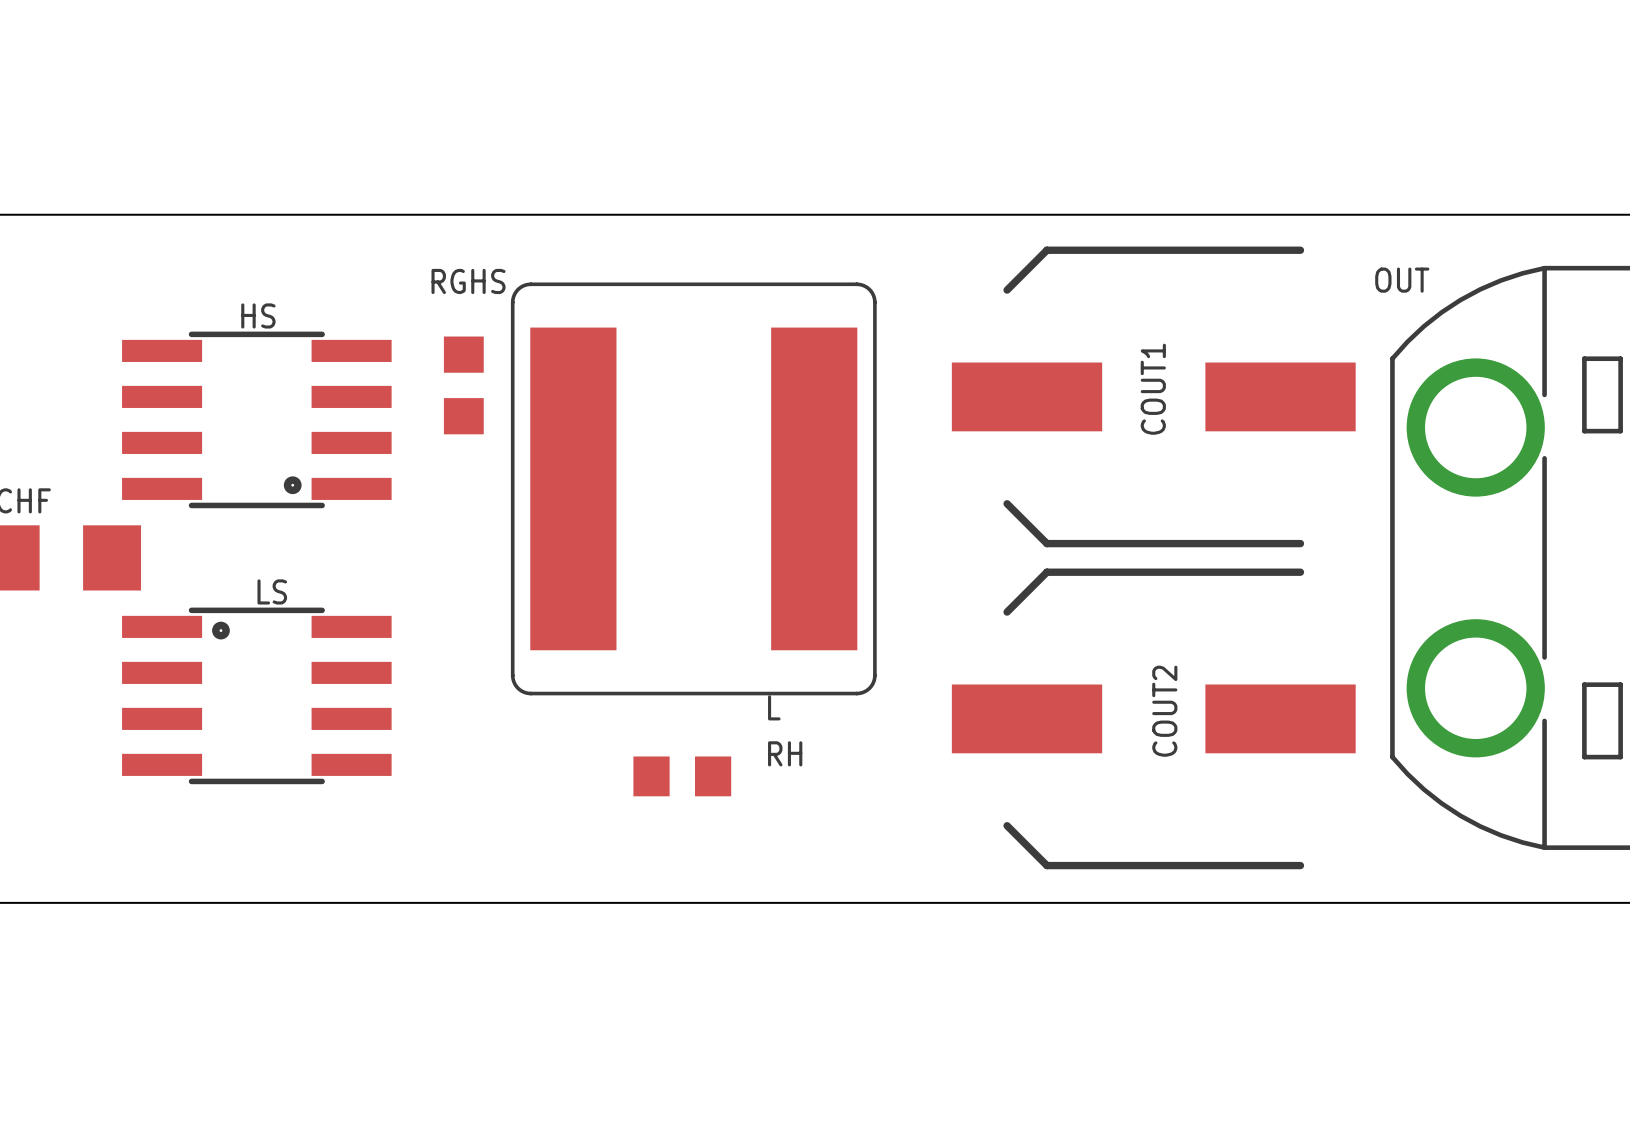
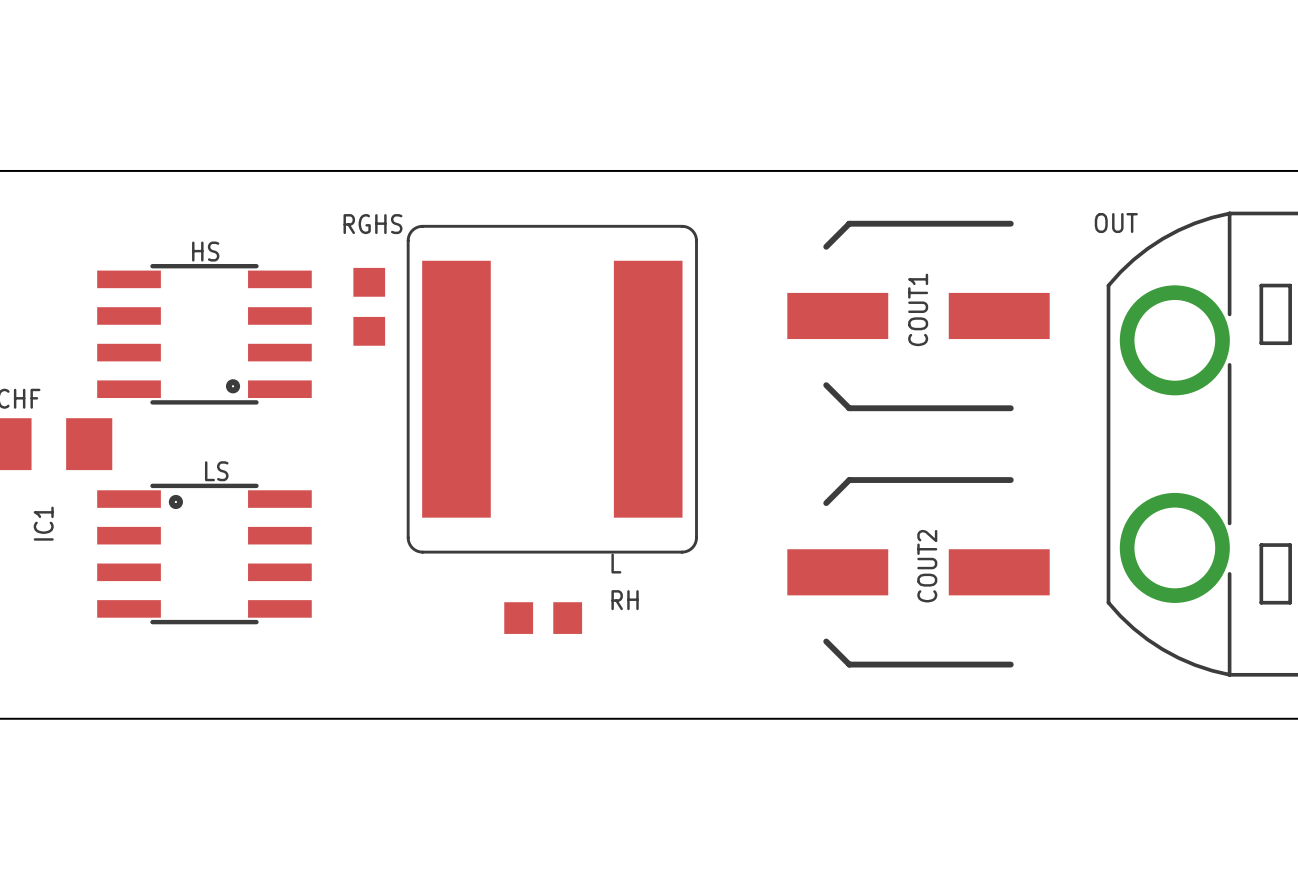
COUT1 footprint: [951, 246, 1356, 548] -> [787, 220, 1050, 412]
COUT2 footprint: [951, 568, 1356, 870] -> [787, 477, 1050, 668]
IC1: none -> (43, 523)

